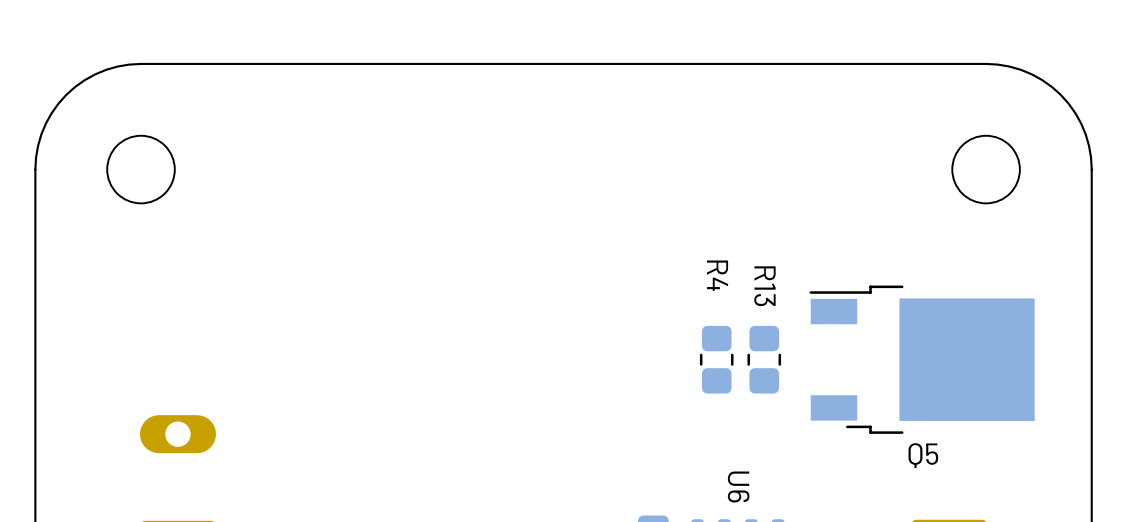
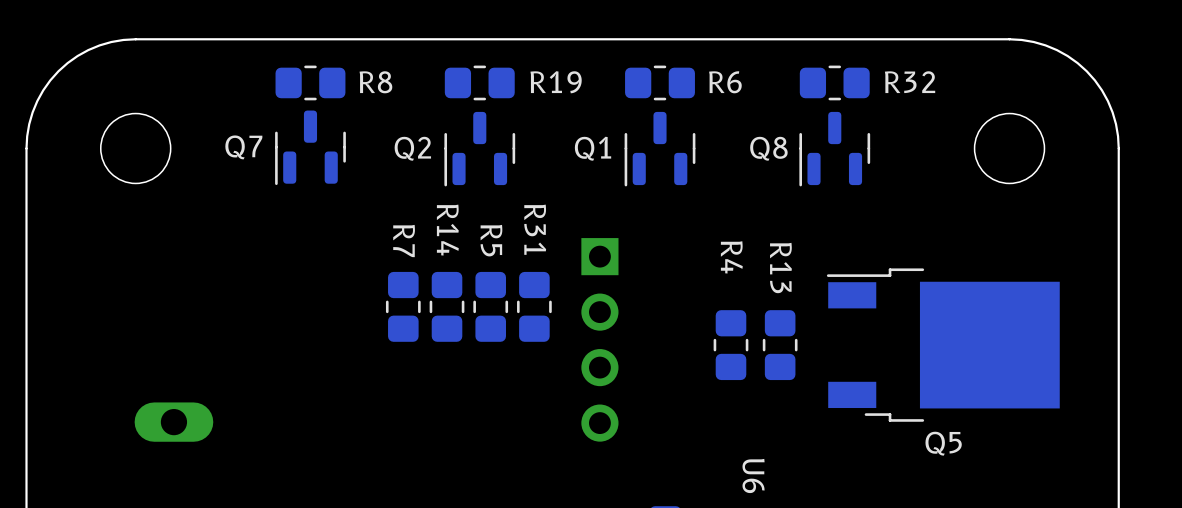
R8: none -> (310, 82)
R19: none -> (479, 82)
R6: none -> (660, 82)
R32: none -> (834, 82)
Q7: none -> (310, 147)
Q2: none -> (479, 149)
Q1: none -> (660, 149)
Q8: none -> (834, 149)
R7: none -> (403, 306)
R14: none -> (447, 306)
R5: none -> (490, 306)
R31: none -> (534, 306)
part: none -> (599, 339)

